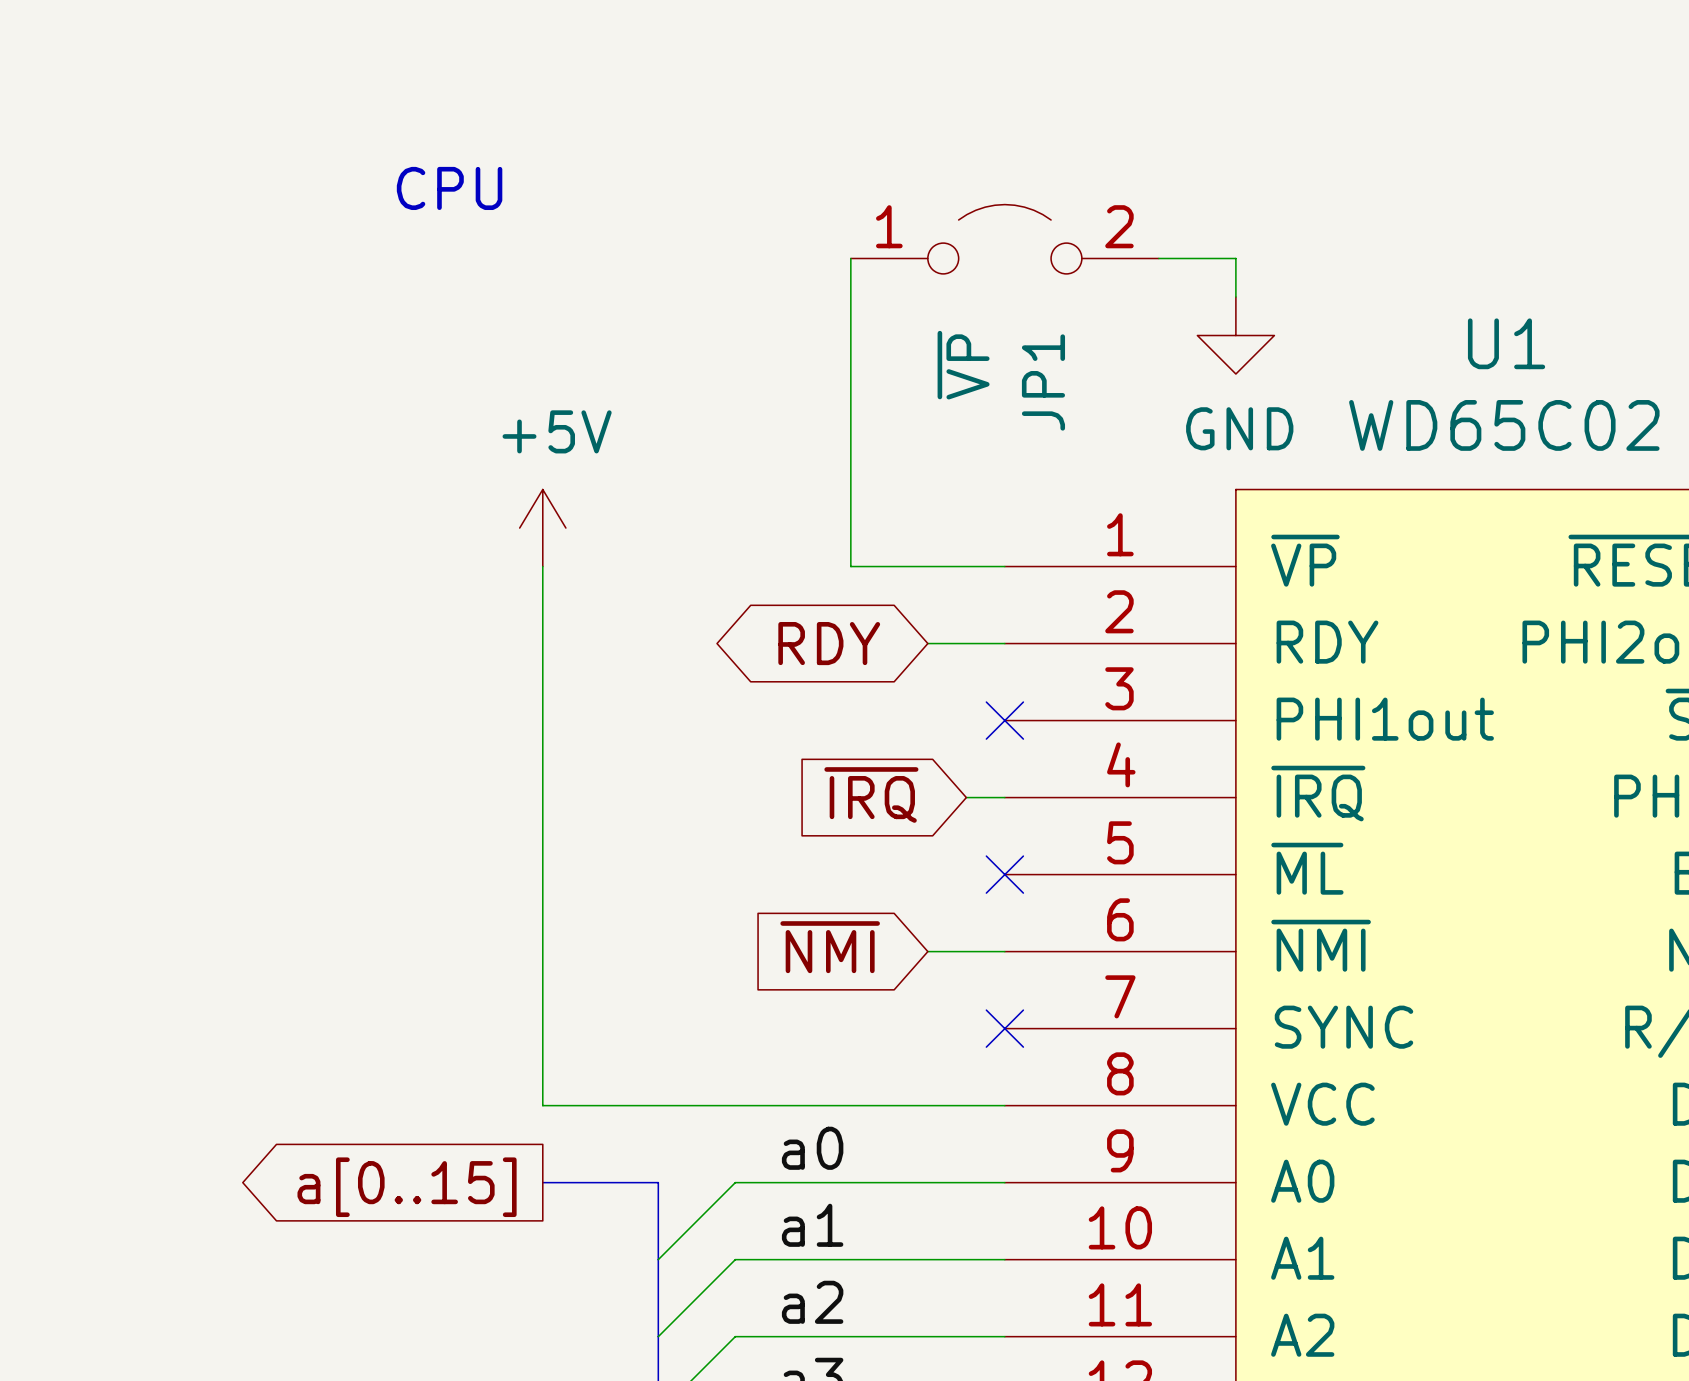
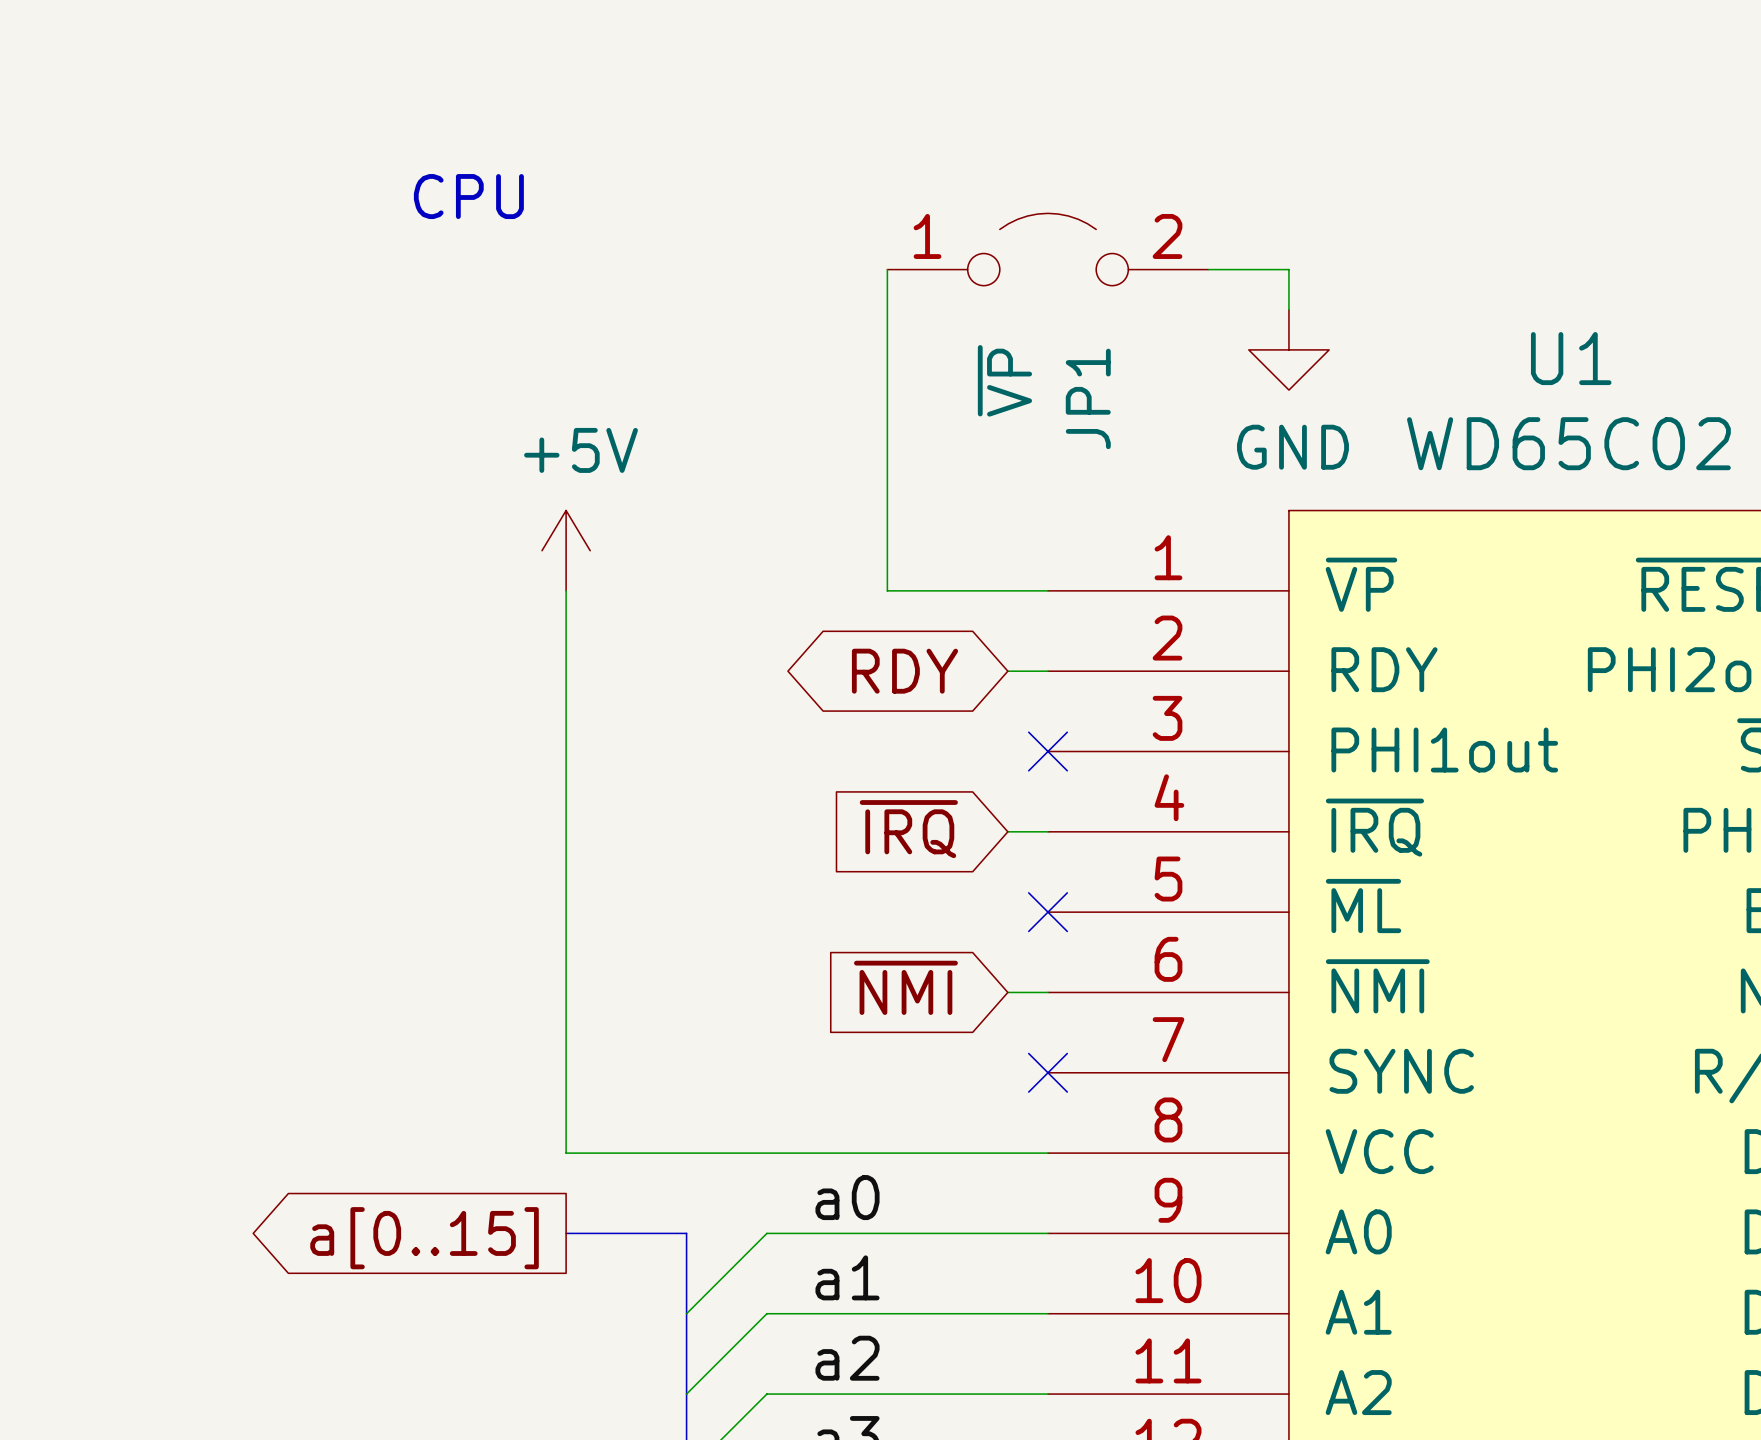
global label position: RDY (829, 643) -> RDY (905, 671)
wire: (927, 643) (966, 643) -> none
global label position: ~{NMI} (830, 947) -> ~{NMI} (905, 987)
wire: (927, 951) (966, 951) -> none

